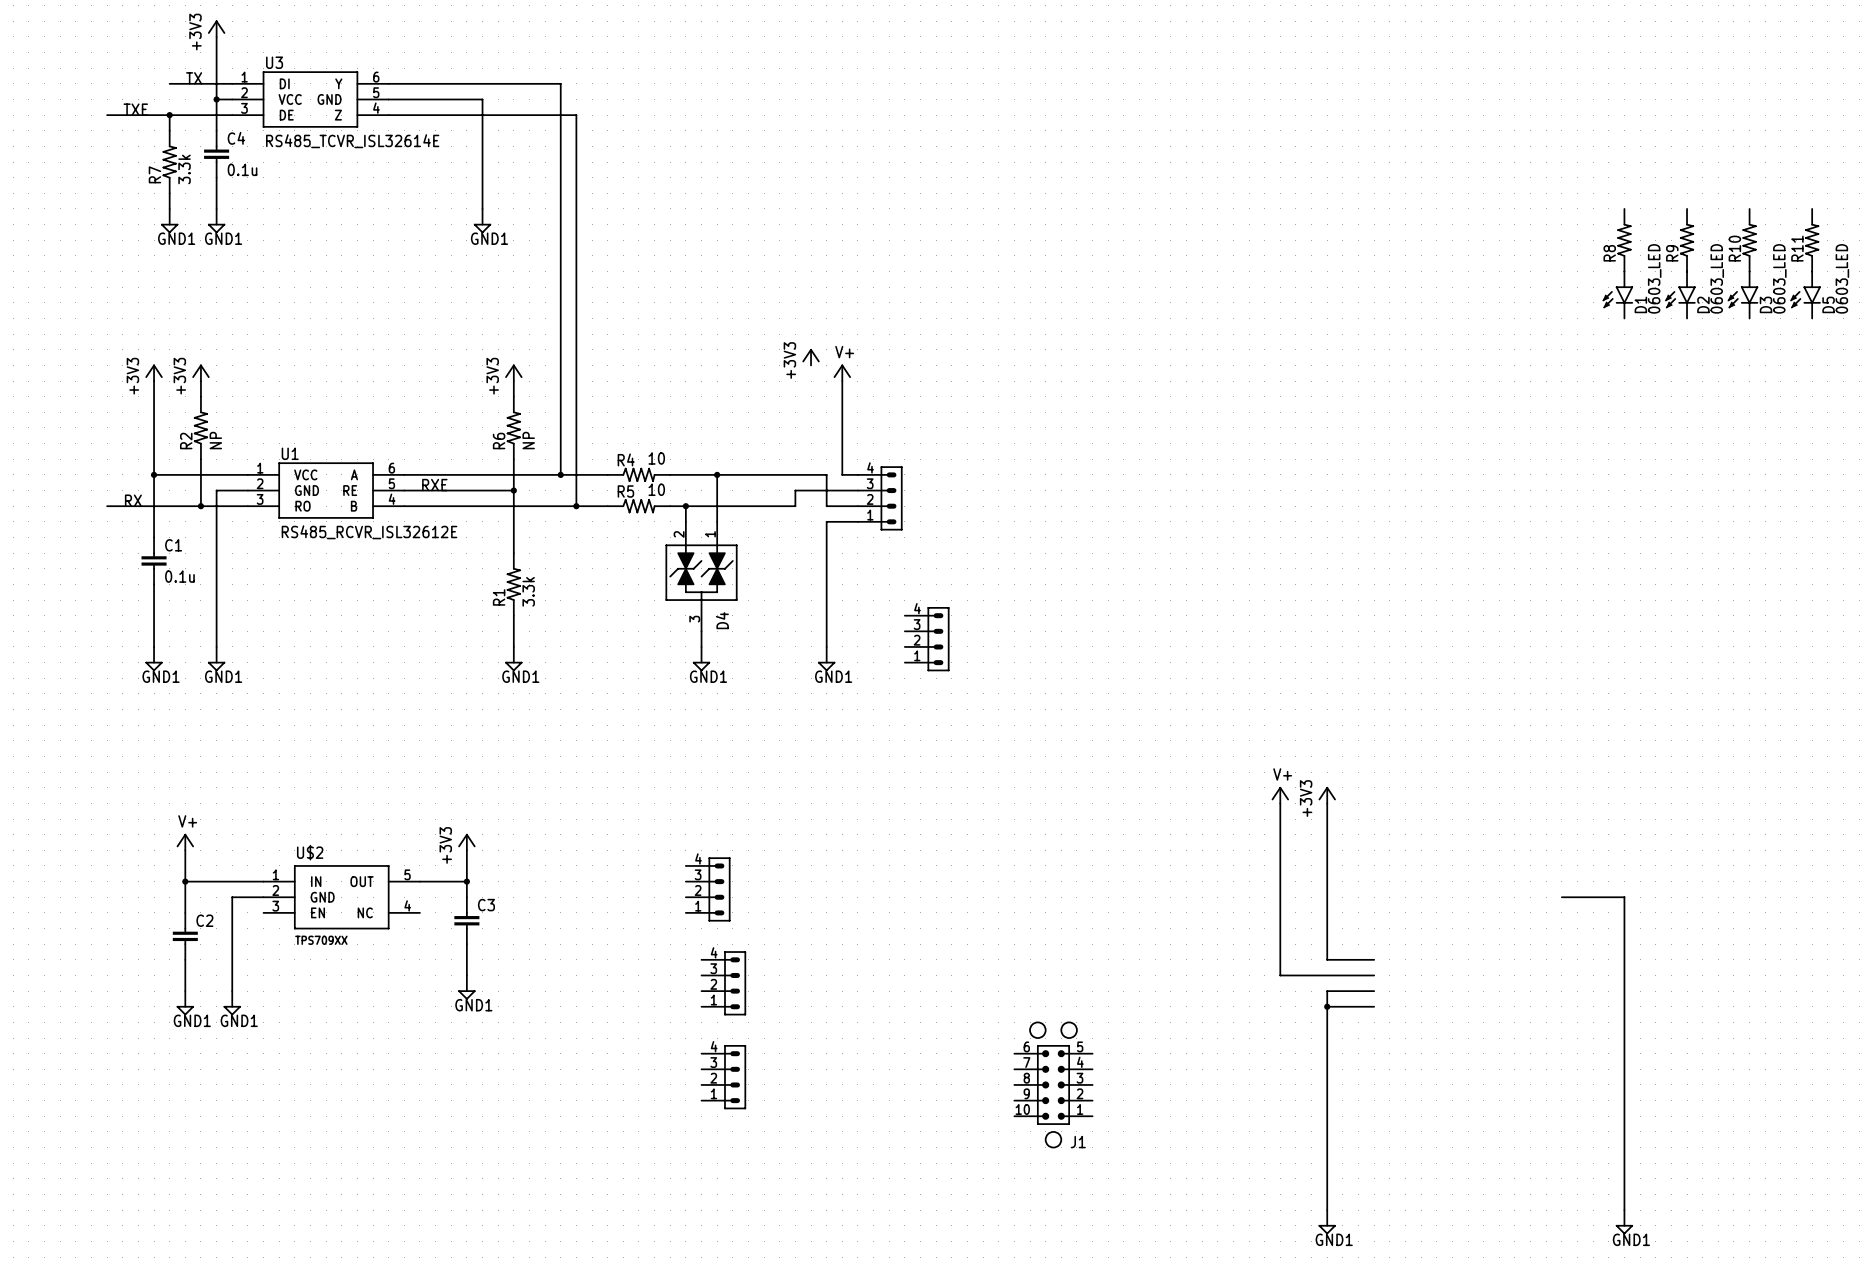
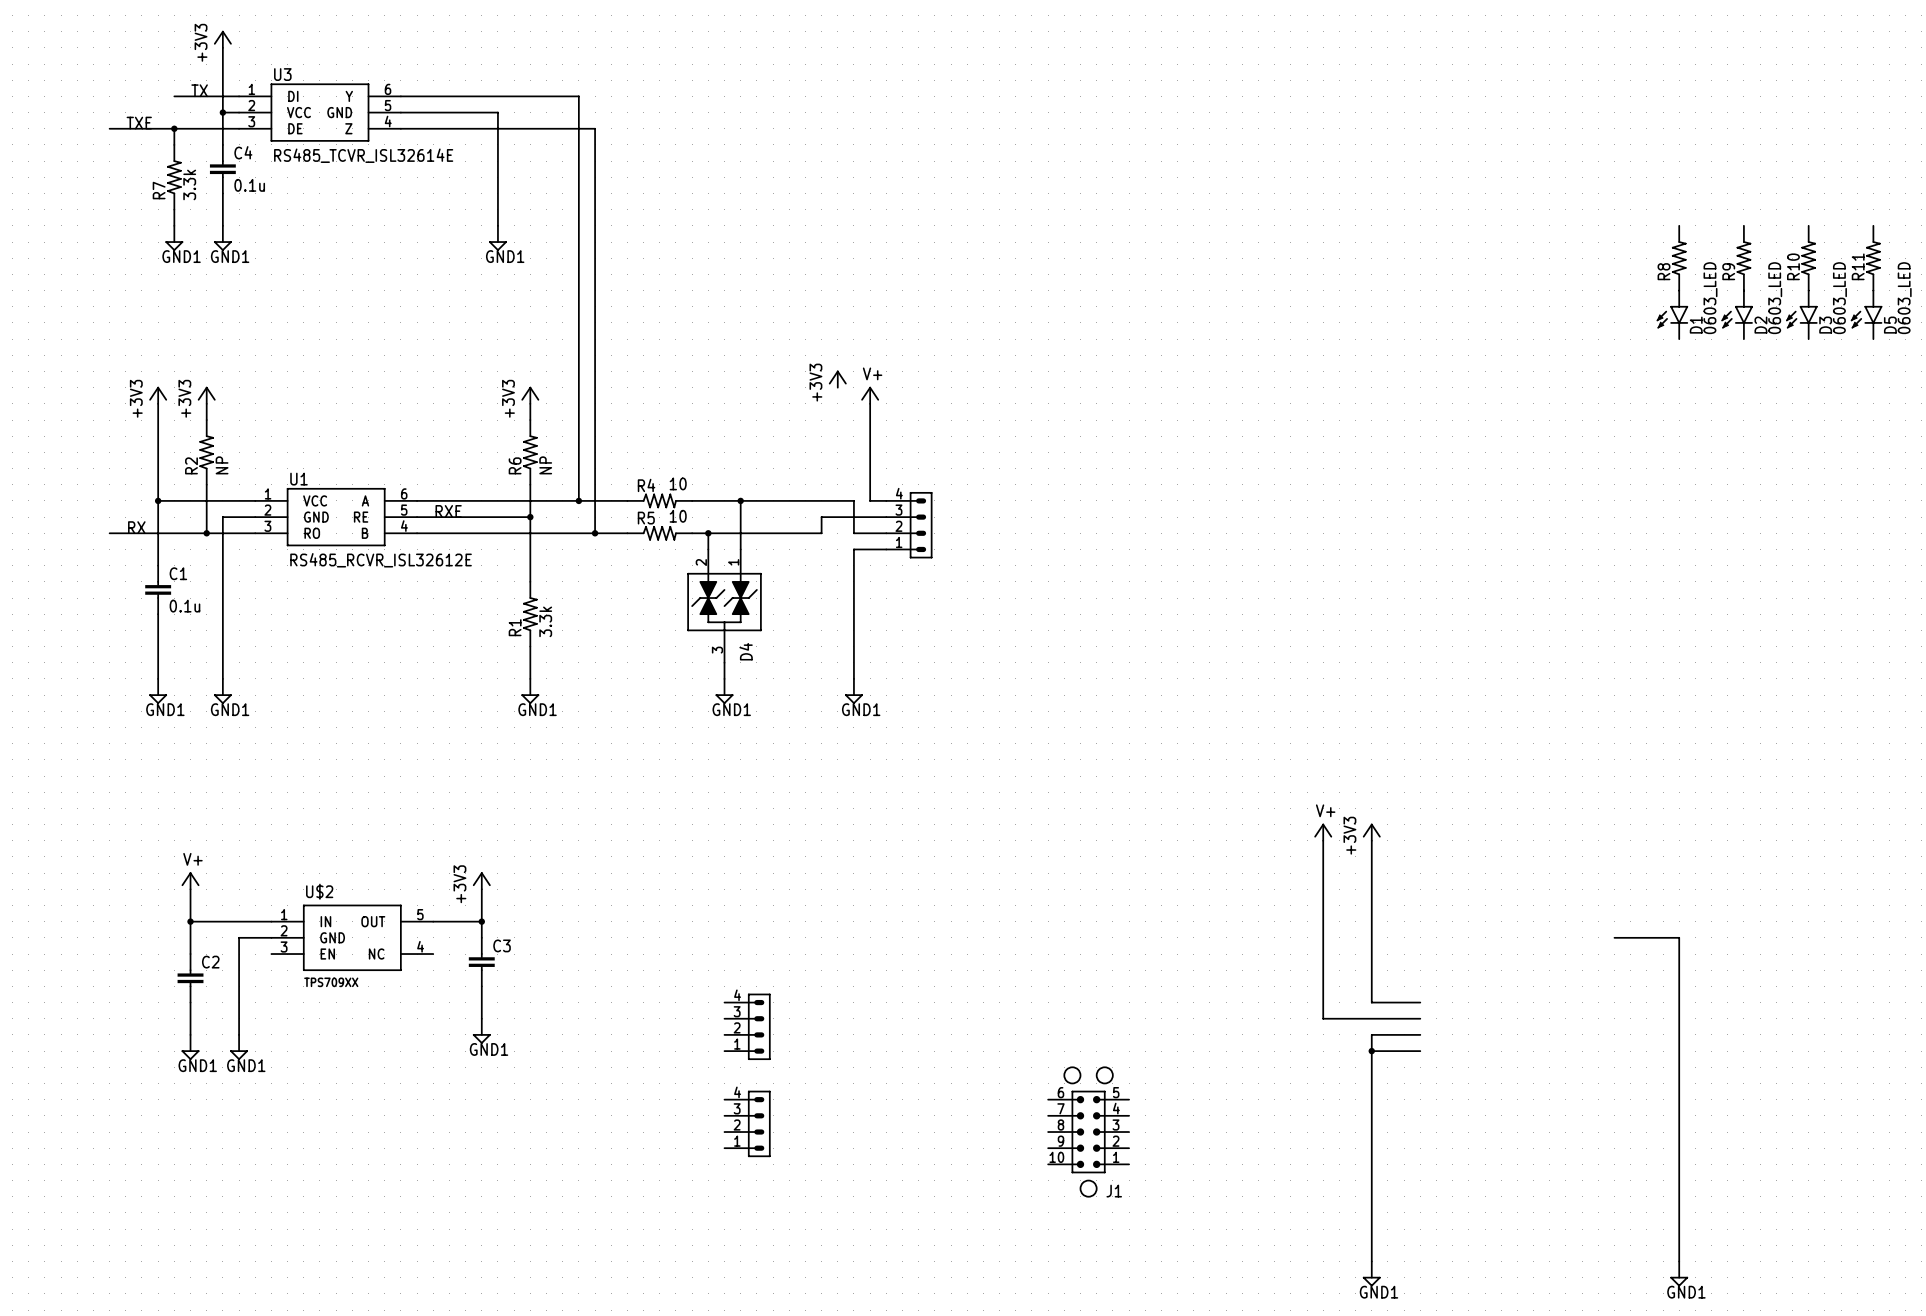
part: (927, 639) -> none
part: (708, 889) -> none

